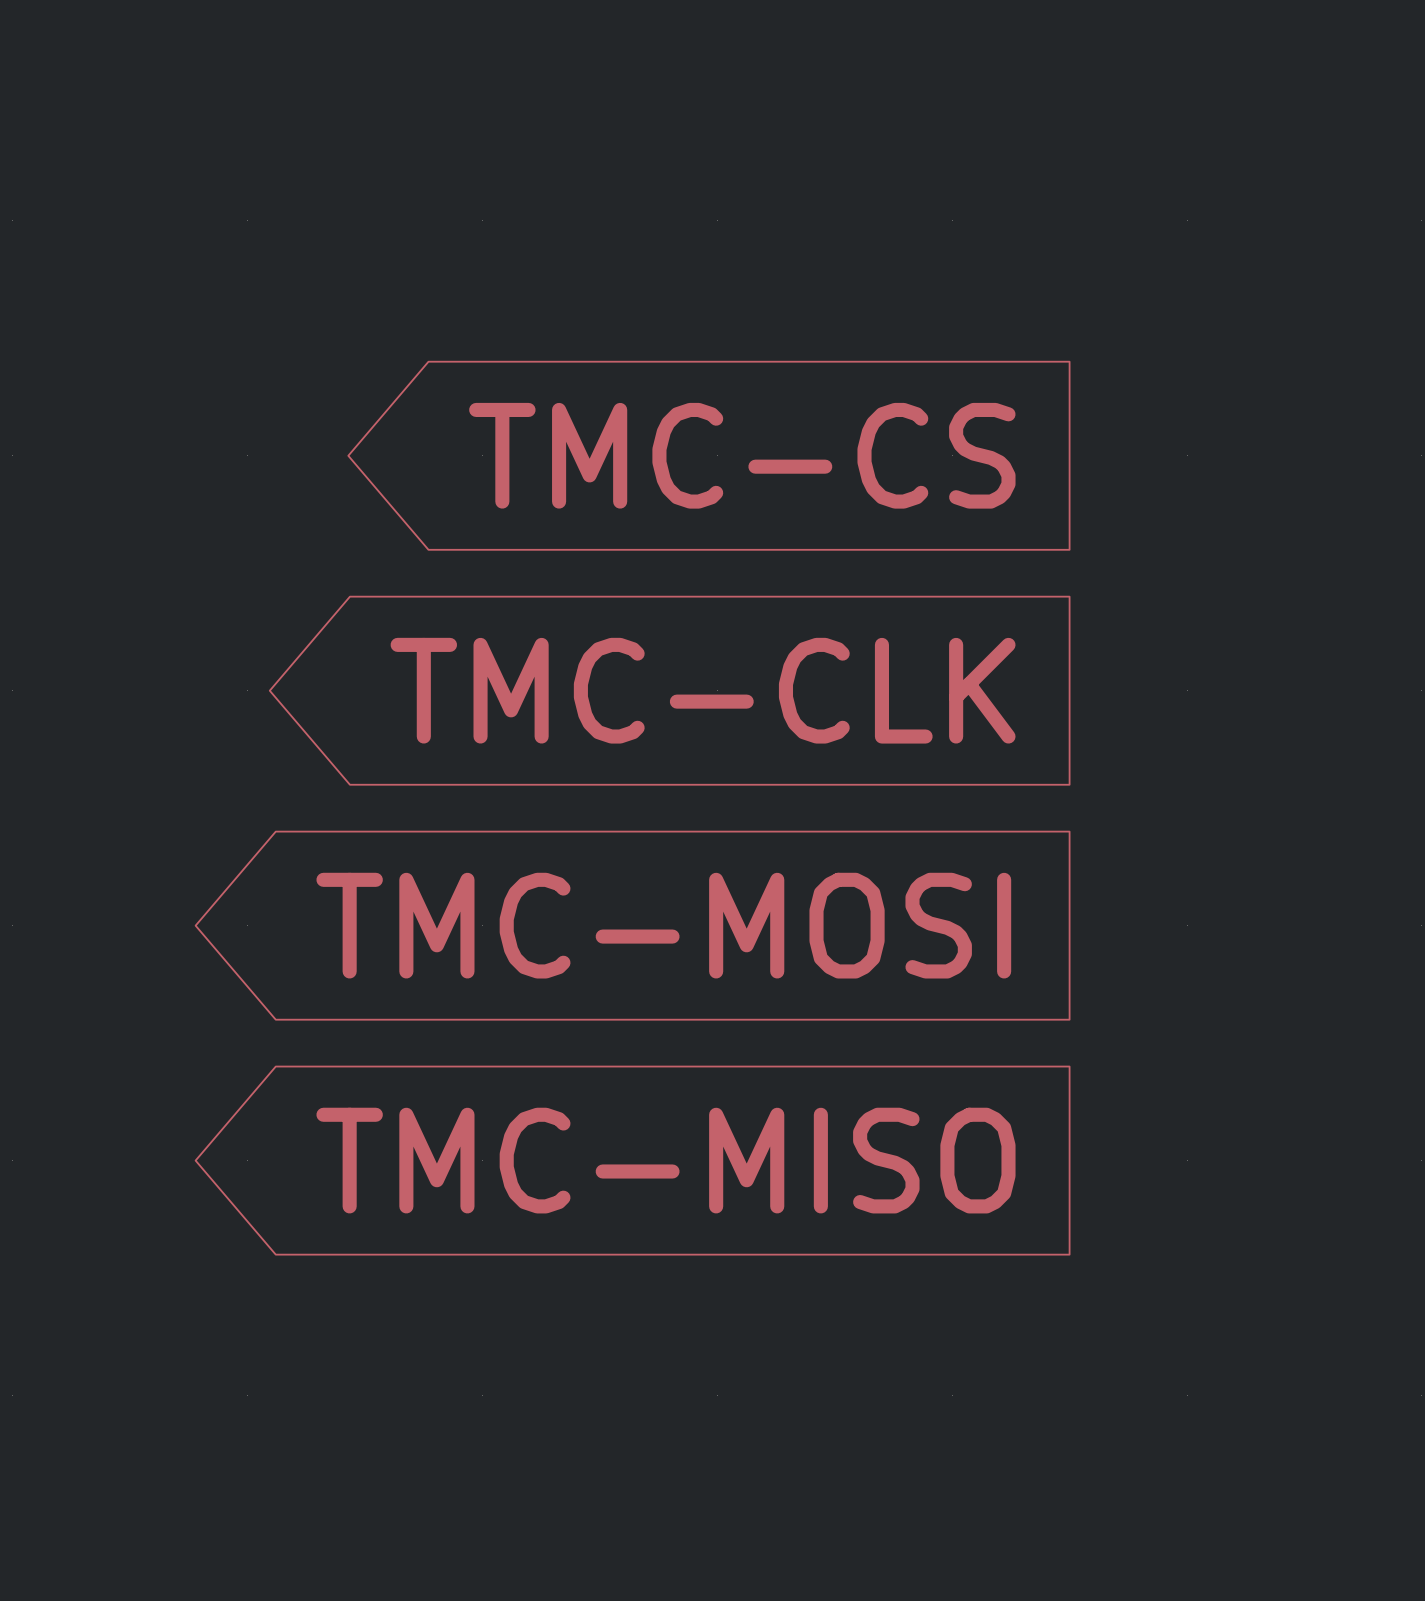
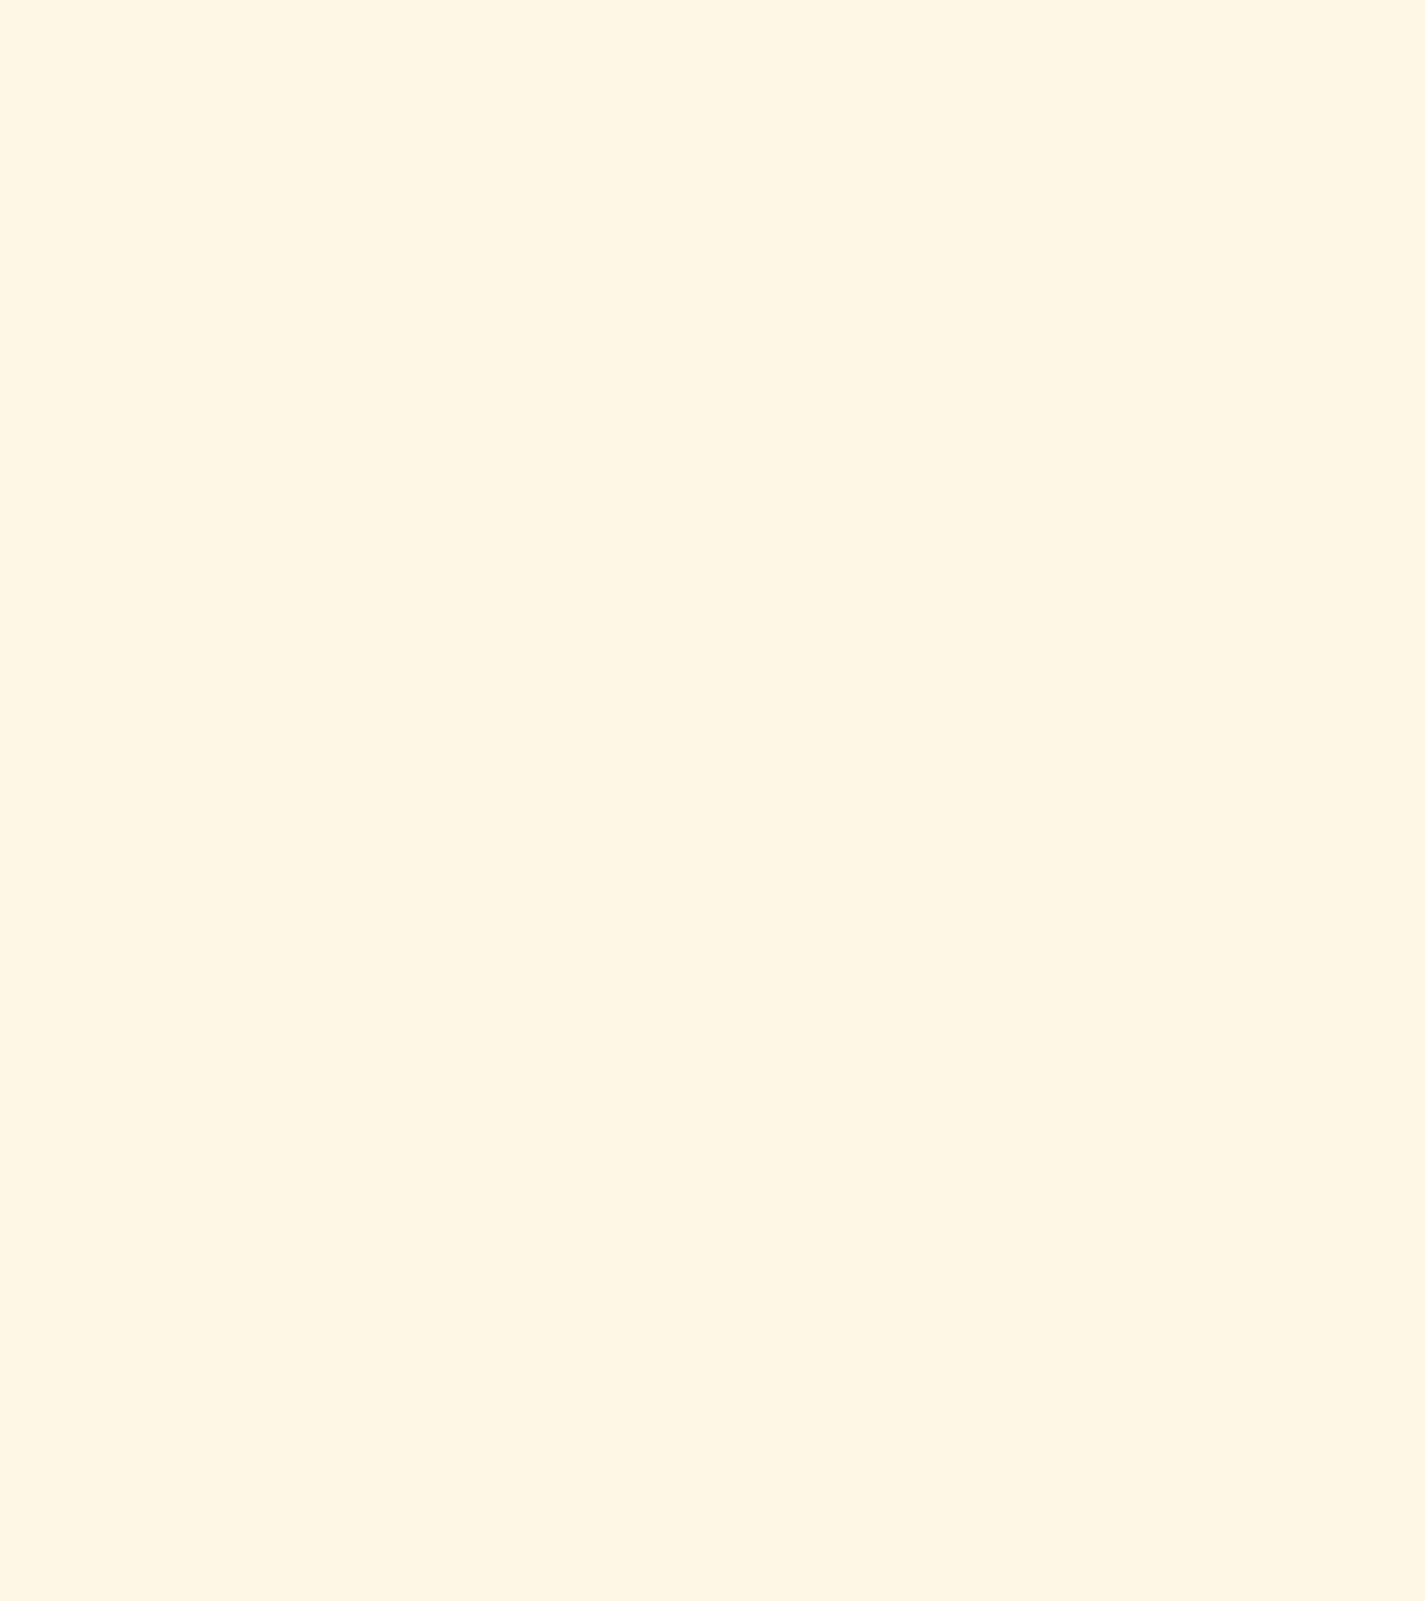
global label: TMC-CS (742, 455) -> none
global label: TMC-CLK (703, 690) -> none
global label: TMC-MOSI (663, 925) -> none
global label: TMC-MISO (665, 1160) -> none

